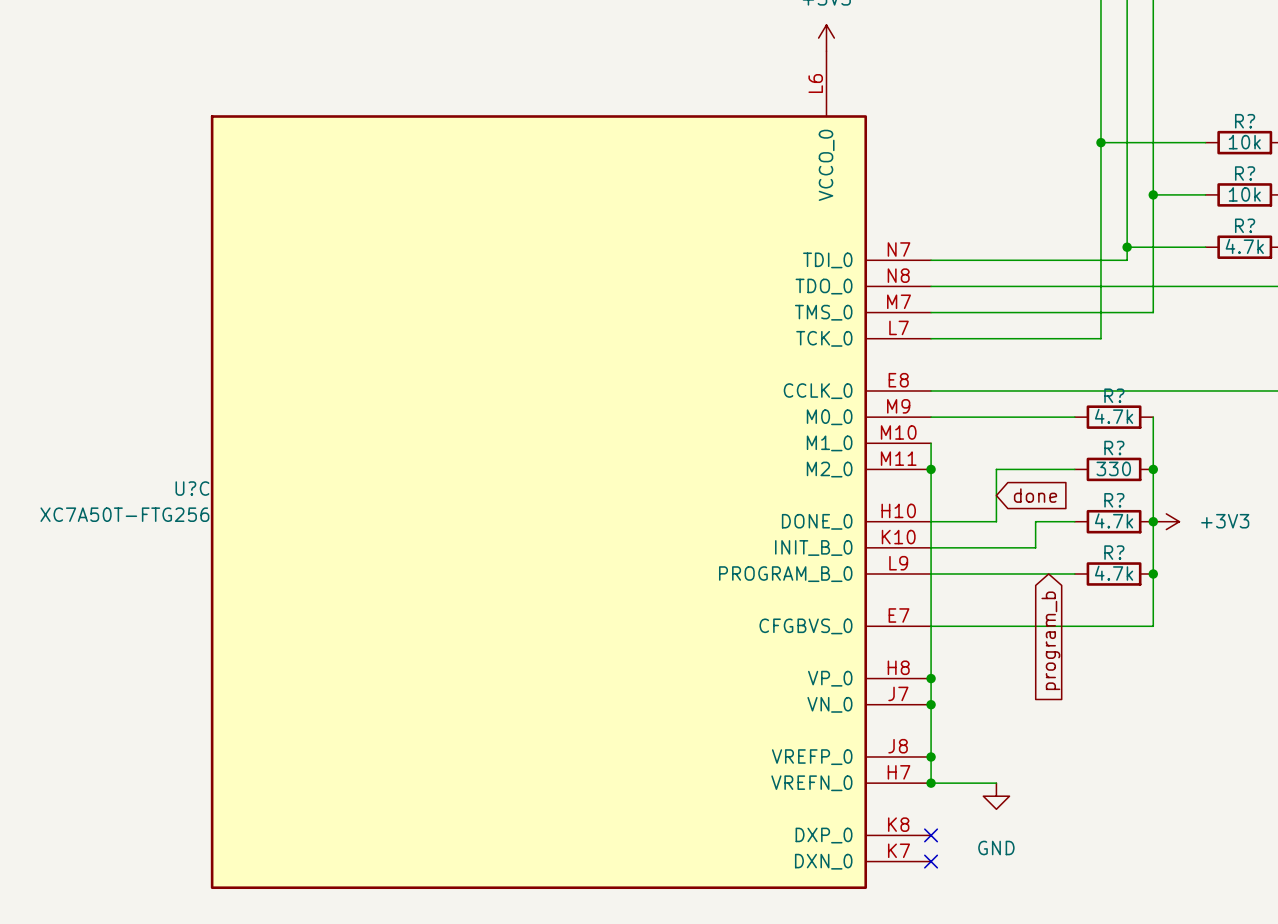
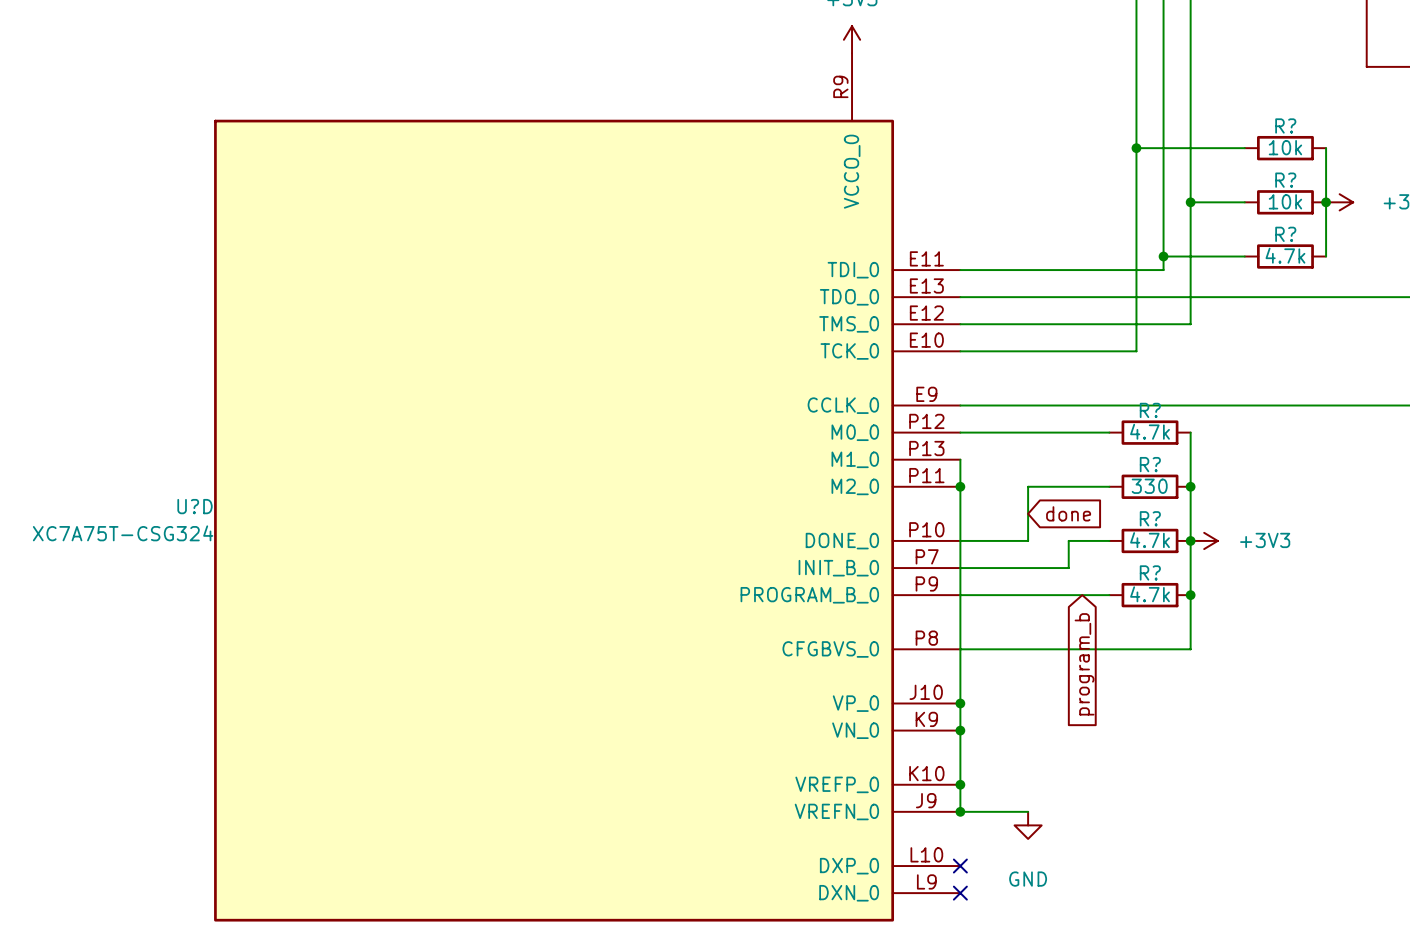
U?C symbol: [210, 51, 932, 890] -> [214, 53, 961, 922]
U?C name: U?C (192, 488) -> U?D (195, 506)
U?C value: XC7A50T-FTG256 (124, 514) -> XC7A75T-CSG324 (123, 533)

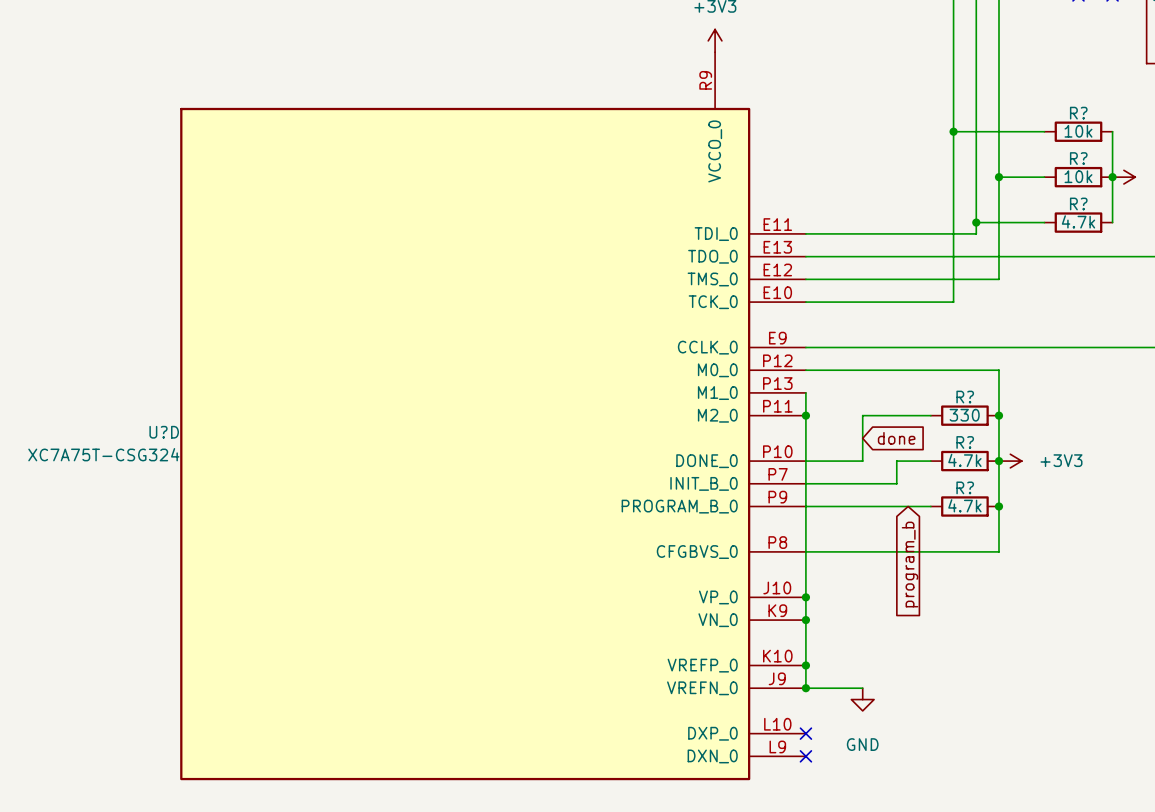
wire: none -> (930, 370) (998, 370)
R?: 4.7k (1150, 432) -> none

